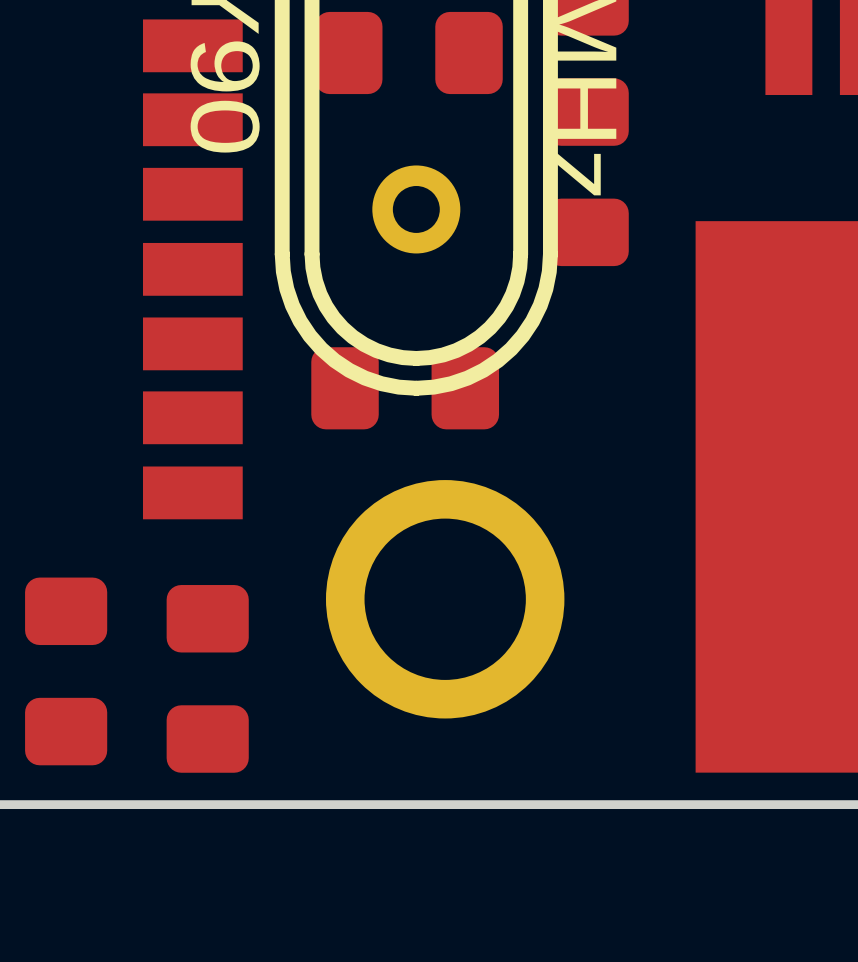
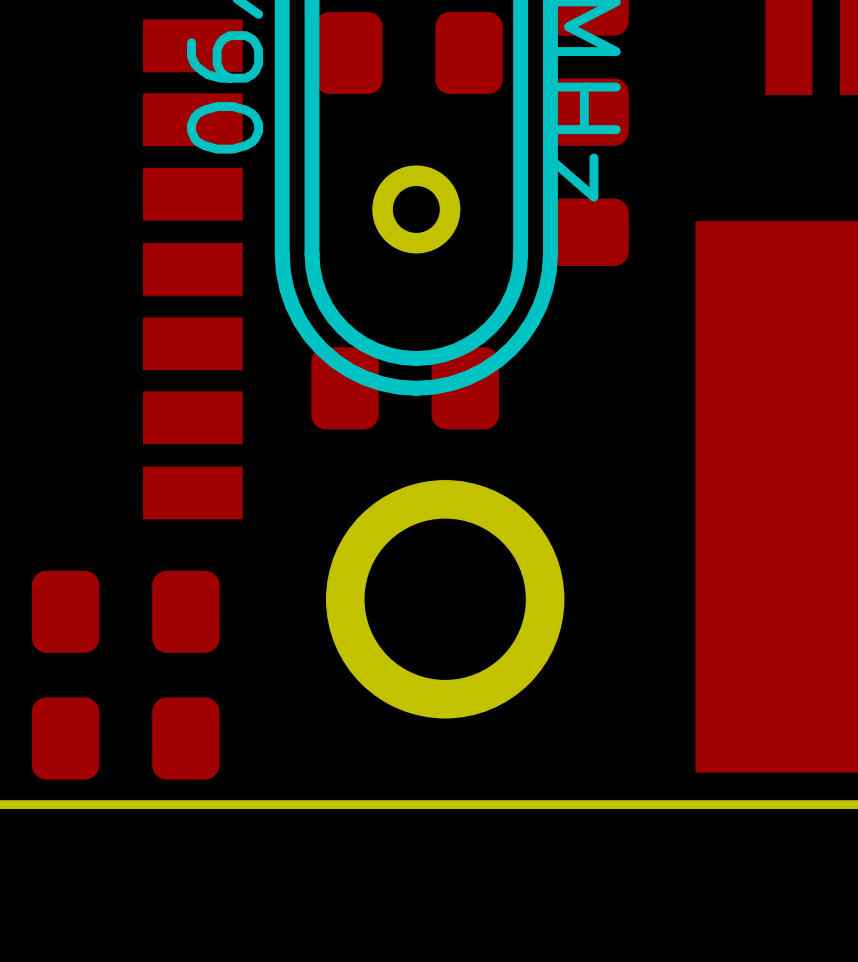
part: none -> (125, 611)
part: (66, 671) -> none
part: (207, 678) -> none
part: none -> (125, 738)

